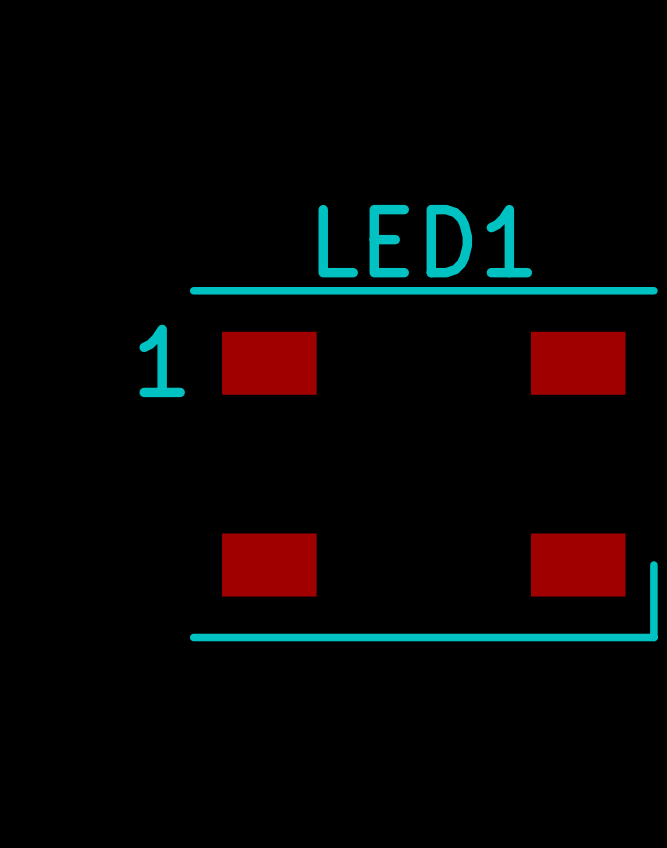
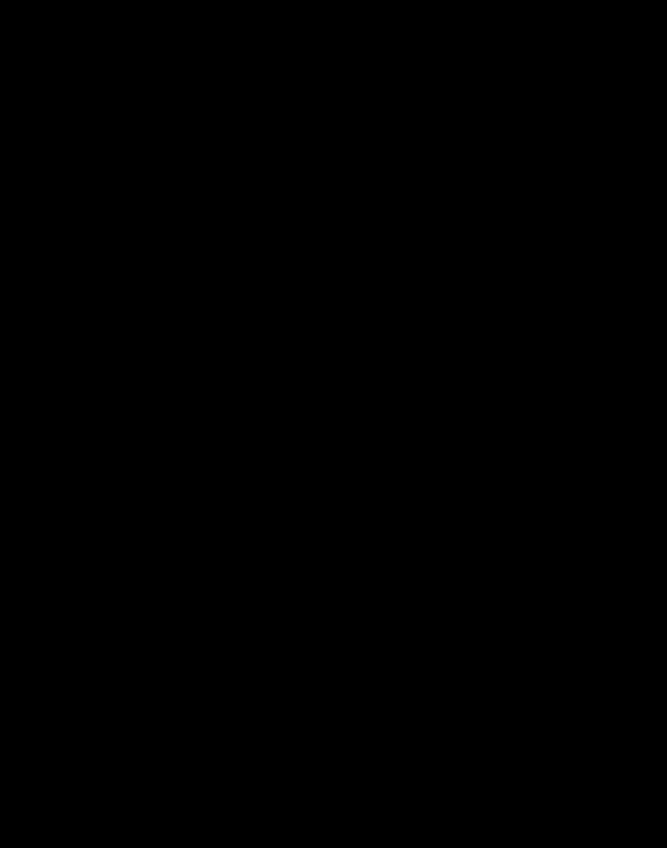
LED1: (423, 464) -> none

